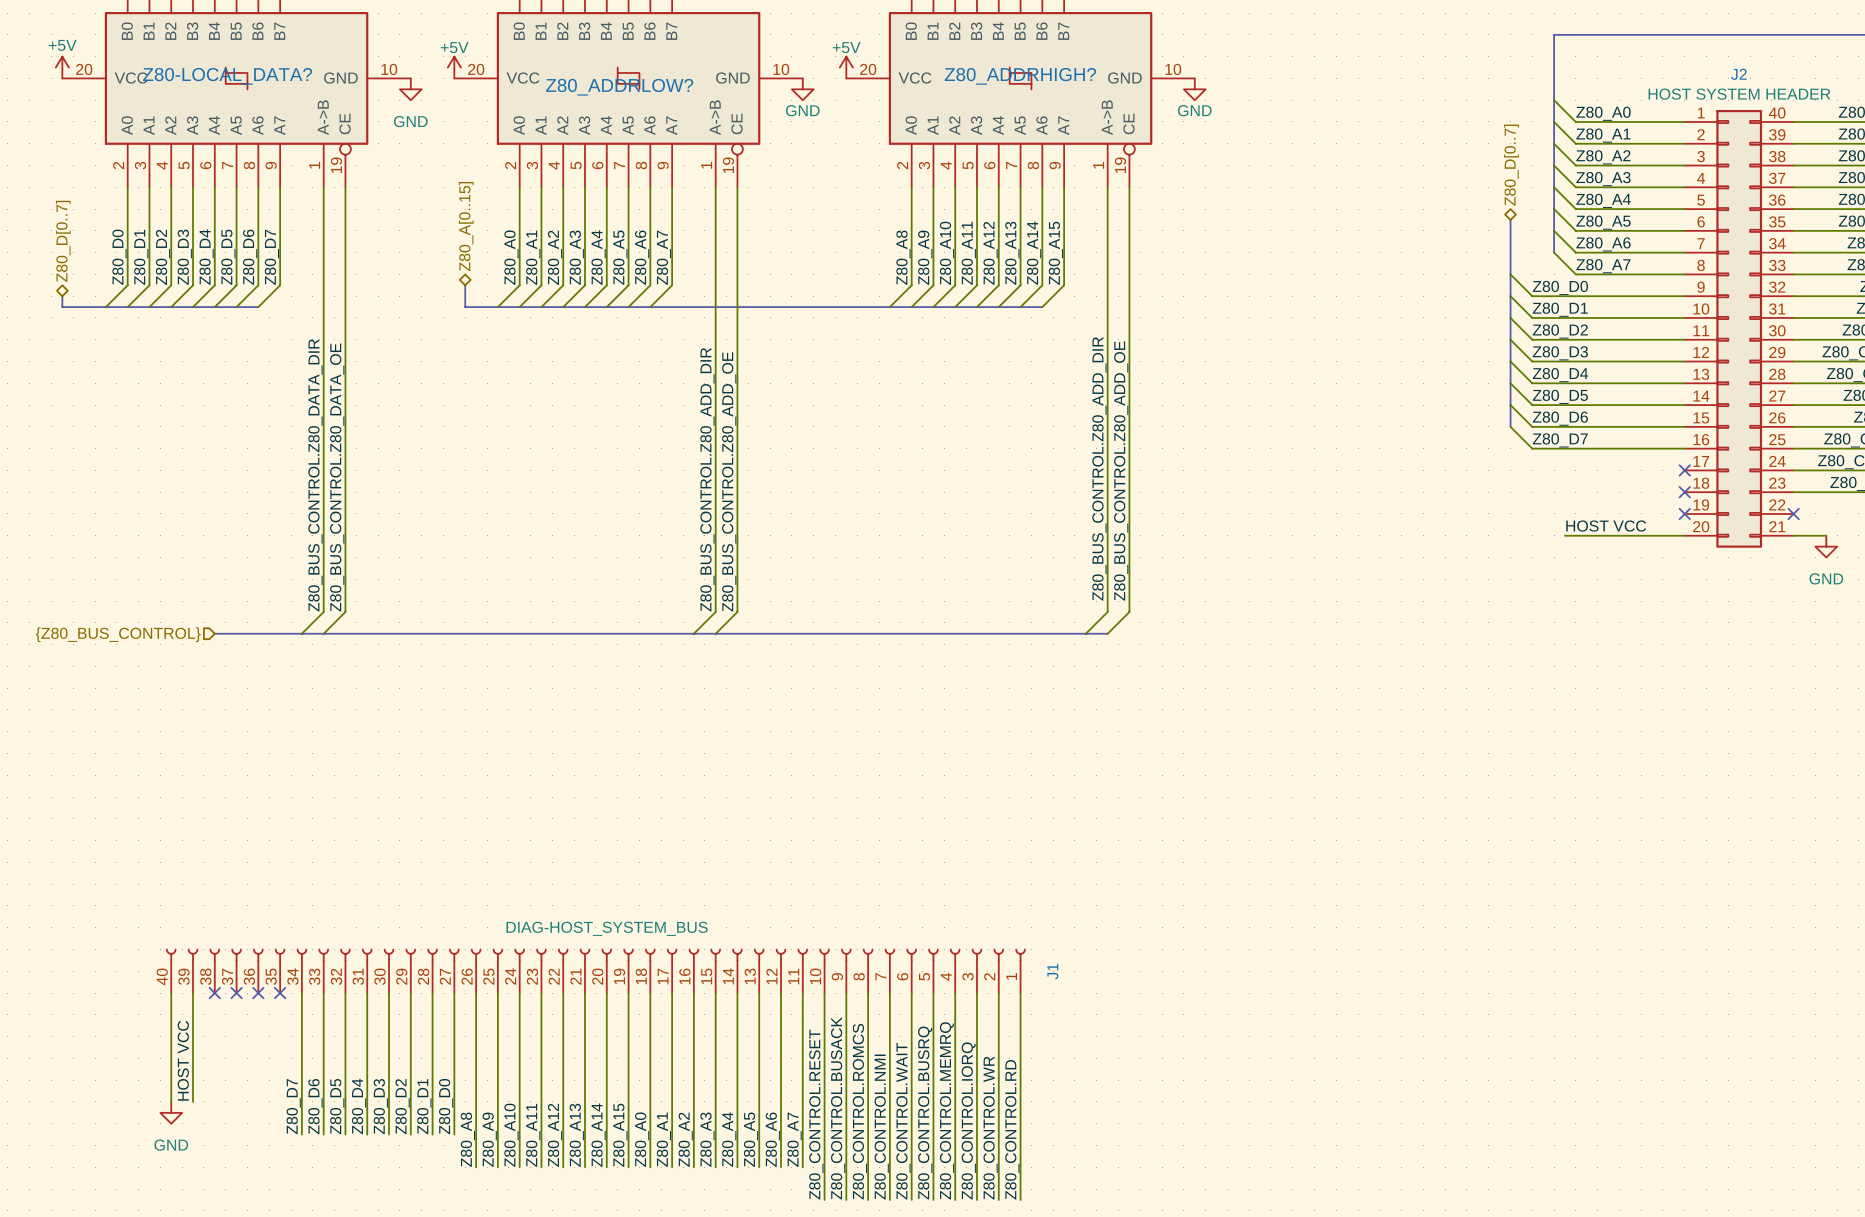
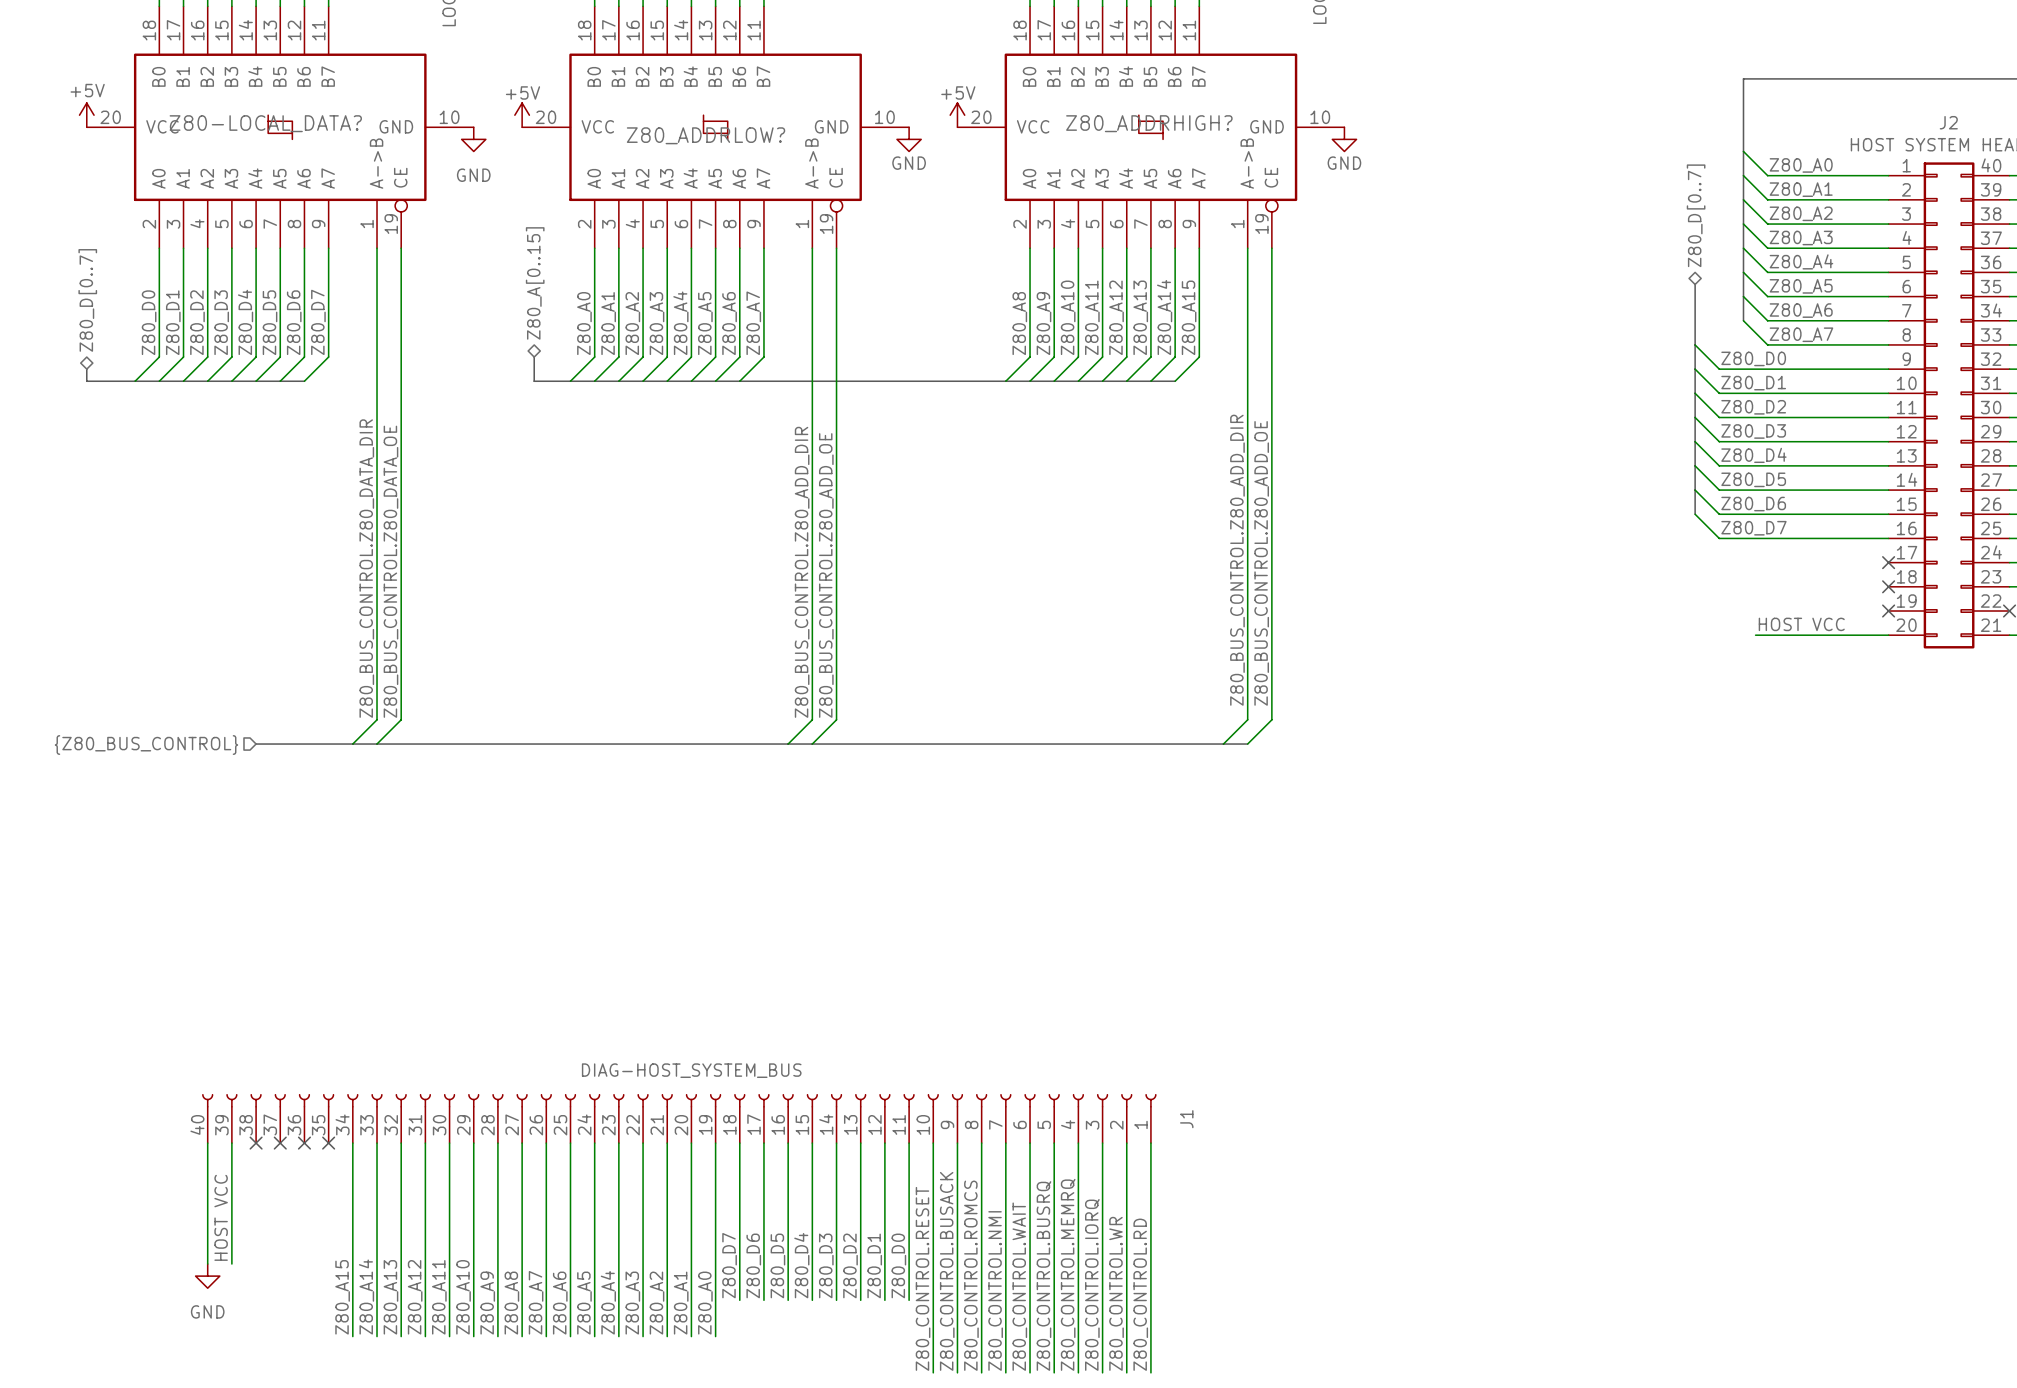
label: Z80_D7 (293, 1106) -> none
label: Z80_D6 (315, 1106) -> none
label: Z80_D5 (337, 1106) -> none
label: Z80_D4 (359, 1106) -> none
label: Z80_D3 (380, 1106) -> none
label: Z80_D2 (402, 1106) -> none
label: Z80_D1 (424, 1106) -> none
label: Z80_D0 (446, 1106) -> none
label: none -> Z80_D7 (729, 1265)
label: none -> Z80_D6 (753, 1265)
label: none -> Z80_D5 (777, 1265)
label: none -> Z80_D4 (801, 1265)
label: none -> Z80_D3 (826, 1265)
label: none -> Z80_D2 (850, 1265)
label: none -> Z80_D1 (874, 1265)
label: none -> Z80_D0 (898, 1265)
wire: none -> (352, 1300) (352, 1336)
wire: none -> (377, 1300) (377, 1336)
wire: none -> (401, 1300) (401, 1336)
wire: none -> (425, 1300) (425, 1336)
wire: none -> (449, 1300) (449, 1336)
wire: none -> (473, 1300) (473, 1336)
wire: none -> (497, 1300) (497, 1336)
wire: (650, 1134) (650, 1167) -> (522, 1300) (522, 1336)
wire: (672, 1134) (672, 1167) -> none
wire: (693, 1134) (693, 1167) -> none
wire: (715, 1134) (715, 1167) -> none
wire: (737, 1134) (737, 1167) -> none
wire: (759, 1134) (759, 1167) -> none
wire: (781, 1134) (781, 1167) -> none
wire: (802, 1134) (802, 1167) -> none
label: none -> Z80_A15 (342, 1297)
label: none -> Z80_A14 (366, 1297)
label: none -> Z80_A13 (390, 1297)
label: none -> Z80_A12 (415, 1297)
label: none -> Z80_A11 (439, 1297)
label: none -> Z80_A10 (463, 1297)
label: Z80_A10 (511, 1135) -> Z80_A5 (584, 1303)
label: Z80_A11 (533, 1135) -> Z80_A4 (608, 1302)
label: Z80_A12 (555, 1135) -> Z80_A3 (632, 1303)
label: Z80_A13 (576, 1135) -> Z80_A2 (657, 1303)
label: Z80_A14 (598, 1135) -> Z80_A1 (681, 1303)
label: Z80_A15 (620, 1135) -> Z80_A0 (705, 1303)
label: none -> Z80_A9 (487, 1303)
label: none -> Z80_A8 (511, 1303)
label: Z80_A8 (467, 1139) -> Z80_A7 (536, 1302)
label: Z80_A9 (489, 1139) -> Z80_A6 (560, 1303)
label: Z80_A0 (642, 1139) -> none
label: Z80_A1 (663, 1139) -> none
label: Z80_A2 (685, 1139) -> none
label: Z80_A3 (707, 1139) -> none
label: Z80_A4 (729, 1139) -> none
label: Z80_A5 (751, 1139) -> none
label: Z80_A6 (772, 1139) -> none
label: Z80_A7 (794, 1139) -> none

